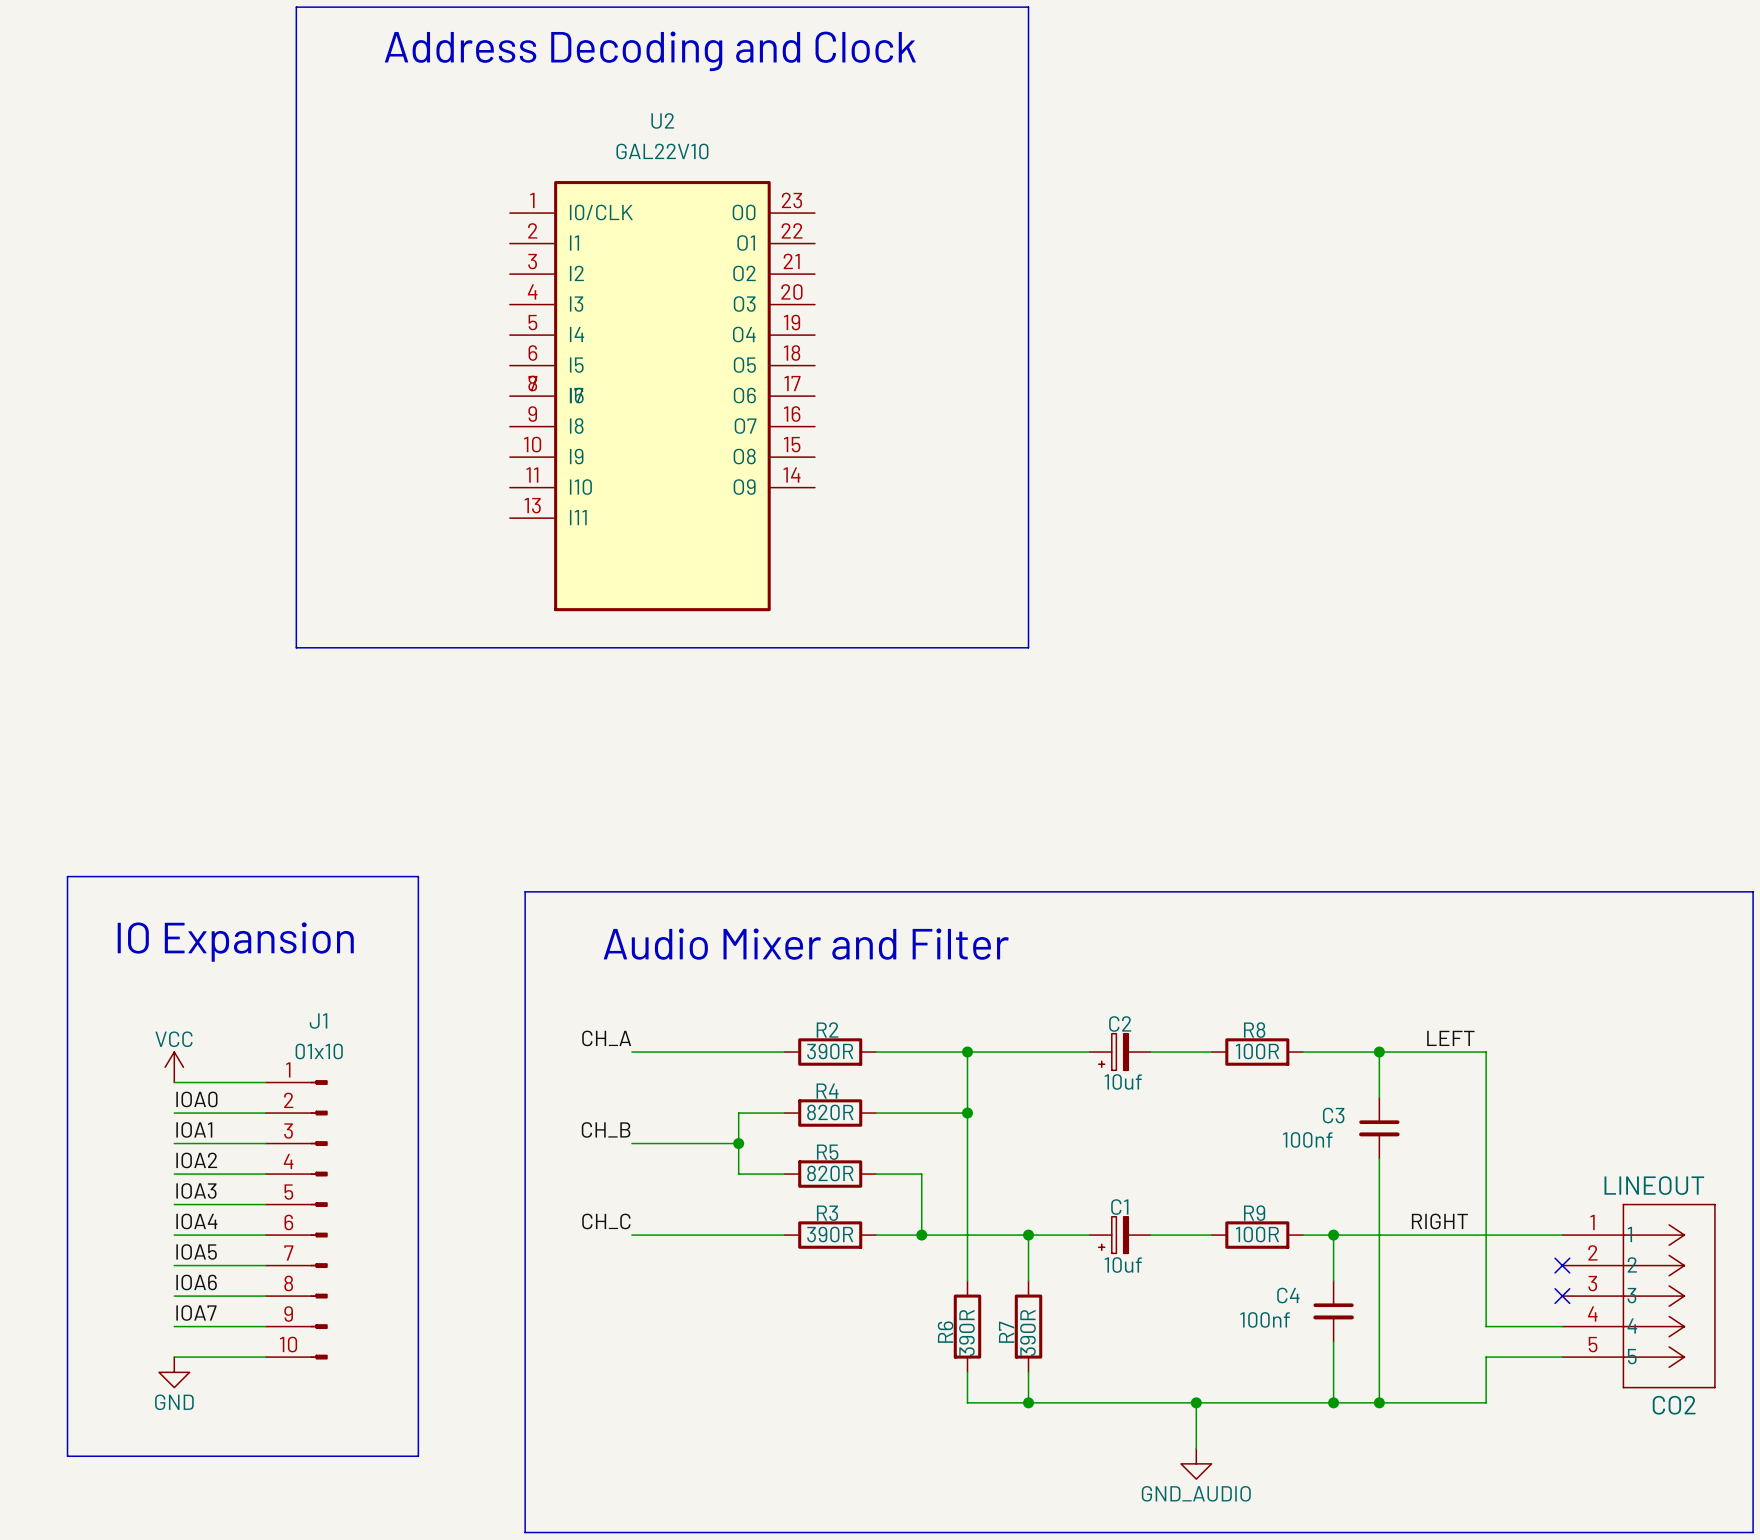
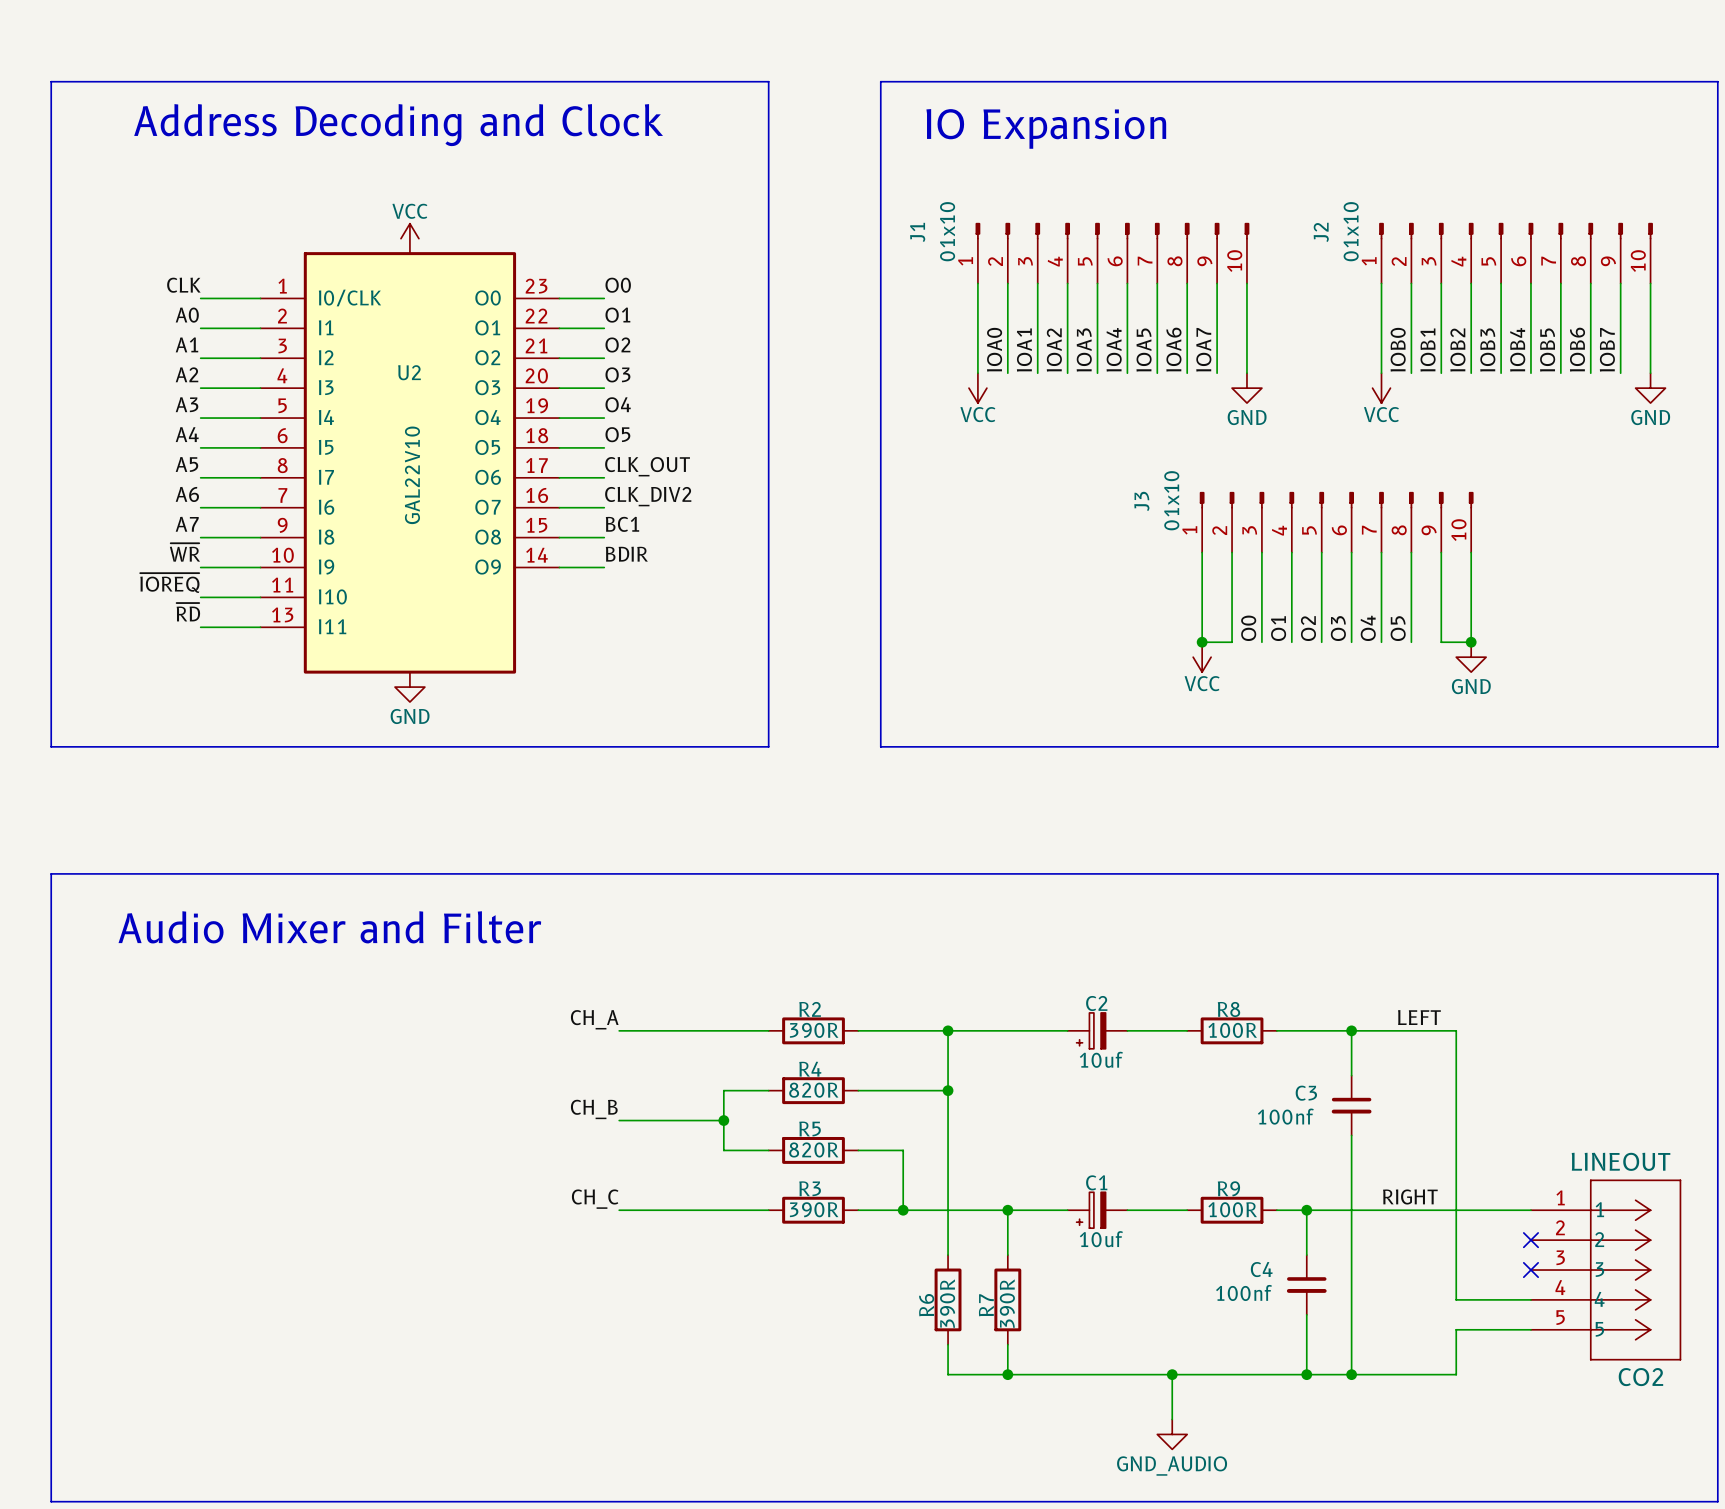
line: (296, 7) (1028, 7) (1028, 647) (296, 647) (296, 7) -> none
text position: Address Decoding and Clock (650, 51) -> Address Decoding and Clock (398, 125)
line: none -> (51, 81) (768, 81) (768, 746) (51, 746) (51, 81)
line: none -> (880, 81) (1717, 81) (1717, 746) (880, 746) (880, 81)
U2 name position: U2 (662, 120) -> U2 (409, 372)
text: none -> IO Expansion (1046, 128)
U2 value position: GAL22V10 (662, 151) -> GAL22V10 (412, 475)
U2 symbol: [509, 181, 815, 612] -> [260, 252, 560, 674]
power symbol: none -> VCC (409, 238)
J2: none -> 01x10 (1516, 253)
wire: none -> (977, 283) (977, 373)
wire: none -> (1037, 283) (1037, 373)
wire: none -> (1067, 283) (1067, 373)
wire: none -> (1097, 283) (1097, 373)
wire: none -> (1127, 283) (1127, 373)
wire: none -> (1157, 283) (1157, 373)
wire: none -> (1187, 283) (1187, 373)
wire: none -> (1217, 283) (1217, 373)
wire: none -> (1246, 283) (1246, 373)
wire: none -> (1381, 283) (1381, 373)
wire: none -> (1411, 283) (1411, 373)
wire: none -> (1441, 283) (1441, 373)
wire: none -> (1471, 283) (1471, 373)
wire: none -> (1501, 283) (1501, 373)
wire: none -> (1530, 283) (1530, 373)
wire: none -> (1560, 283) (1560, 373)
wire: none -> (1590, 283) (1590, 373)
wire: none -> (1620, 283) (1620, 373)
wire: none -> (1650, 283) (1650, 373)
label: none -> CLK (183, 285)
label: none -> O0 (618, 285)
wire: none -> (200, 298) (260, 298)
label: none -> A0 (187, 315)
label: none -> O1 (617, 315)
wire: none -> (200, 328) (260, 328)
label: none -> A1 (186, 344)
label: none -> O2 (617, 345)
label: none -> IOA0 (994, 349)
label: none -> IOA2 (1054, 350)
label: none -> IOA3 (1084, 349)
label: none -> IOA4 (1114, 349)
label: none -> IOA5 (1144, 350)
label: none -> IOA6 (1173, 349)
label: none -> IOA7 (1203, 349)
label: none -> IOB0 (1398, 349)
label: none -> IOB2 (1457, 350)
label: none -> IOB3 (1487, 349)
label: none -> IOB4 (1517, 349)
label: none -> IOB5 (1547, 350)
label: none -> IOB6 (1577, 349)
label: none -> IOB7 (1607, 349)
label: none -> IOA1 (1024, 350)
label: none -> IOB1 (1428, 350)
wire: none -> (200, 358) (260, 358)
label: none -> A2 (187, 374)
label: none -> O3 (617, 374)
wire: none -> (200, 388) (260, 388)
power symbol: none -> VCC (977, 388)
power symbol: none -> GND (1246, 388)
power symbol: none -> VCC (1381, 388)
power symbol: none -> GND (1650, 388)
label: none -> A3 (187, 404)
label: none -> O4 (618, 404)
wire: none -> (200, 418) (260, 418)
label: none -> A4 (187, 434)
label: none -> O5 (617, 434)
wire: none -> (200, 447) (260, 447)
label: none -> A5 (186, 464)
label: none -> CLK_OUT (647, 466)
wire: none -> (200, 477) (260, 477)
label: none -> A6 (187, 494)
label: none -> CLK_DIV2 (648, 496)
wire: none -> (200, 507) (260, 507)
J3: none -> 01x10 (1336, 522)
label: none -> A7 (187, 524)
label: none -> BC1 (622, 524)
wire: none -> (200, 537) (260, 537)
label: none -> ~{WR} (184, 552)
wire: none -> (1202, 552) (1202, 642) (1232, 642) (1232, 552)
wire: none -> (1261, 552) (1261, 642)
wire: none -> (1291, 552) (1291, 642)
wire: none -> (1321, 552) (1321, 642)
wire: none -> (1351, 552) (1351, 642)
wire: none -> (1381, 552) (1381, 642)
wire: none -> (1411, 552) (1411, 642)
wire: none -> (1441, 552) (1441, 642) (1471, 642) (1471, 552)
label: none -> BDIR (626, 554)
wire: none -> (200, 567) (260, 567)
label: none -> ~{IOREQ} (169, 583)
wire: none -> (200, 597) (260, 597)
label: none -> ~{RD} (188, 612)
wire: none -> (200, 627) (260, 627)
label: none -> O0 (1248, 628)
label: none -> O2 (1308, 628)
label: none -> O3 (1338, 628)
label: none -> O4 (1368, 628)
label: none -> O5 (1398, 628)
label: none -> O1 (1278, 628)
junction: none -> (1202, 642)
junction: none -> (1471, 642)
power symbol: none -> VCC (1202, 657)
power symbol: none -> GND (1471, 657)
power symbol: none -> GND (409, 687)
line: (67, 876) (418, 876) (418, 1456) (67, 1456) (67, 876) -> none
line: (525, 891) (525, 1532) -> (514, 873) (51, 873) (51, 1501) (514, 1501)
text: IO Expansion (235, 942) -> none
text: Audio Mixer and Filter (806, 944) -> none
text: none -> Audio Mixer and Filter (329, 927)
power symbol: VCC (174, 1067) -> none
wire: (174, 1082) (265, 1082) -> none
label: IOA0 (196, 1099) -> none
wire: (174, 1113) (265, 1113) -> none
label: IOA1 (194, 1129) -> none
wire: (174, 1143) (265, 1143) -> none
label: IOA2 (196, 1160) -> none
wire: (174, 1174) (265, 1174) -> none
label: IOA3 (196, 1190) -> none
wire: (174, 1204) (265, 1204) -> none
J1 position: (296, 1219) -> (1112, 253)
J1 rotation: 0° (319, 1219) -> 90° counterclockwise (1112, 231)
label: IOA4 (196, 1221) -> none
wire: (174, 1235) (265, 1235) -> none
label: IOA5 (196, 1251) -> none
wire: (174, 1265) (265, 1265) -> none
label: IOA6 (196, 1282) -> none
wire: (174, 1296) (265, 1296) -> none
label: IOA7 (196, 1312) -> none
wire: (174, 1326) (265, 1326) -> none
wire: (174, 1357) (265, 1357) -> none
power symbol: GND (174, 1372) -> none

